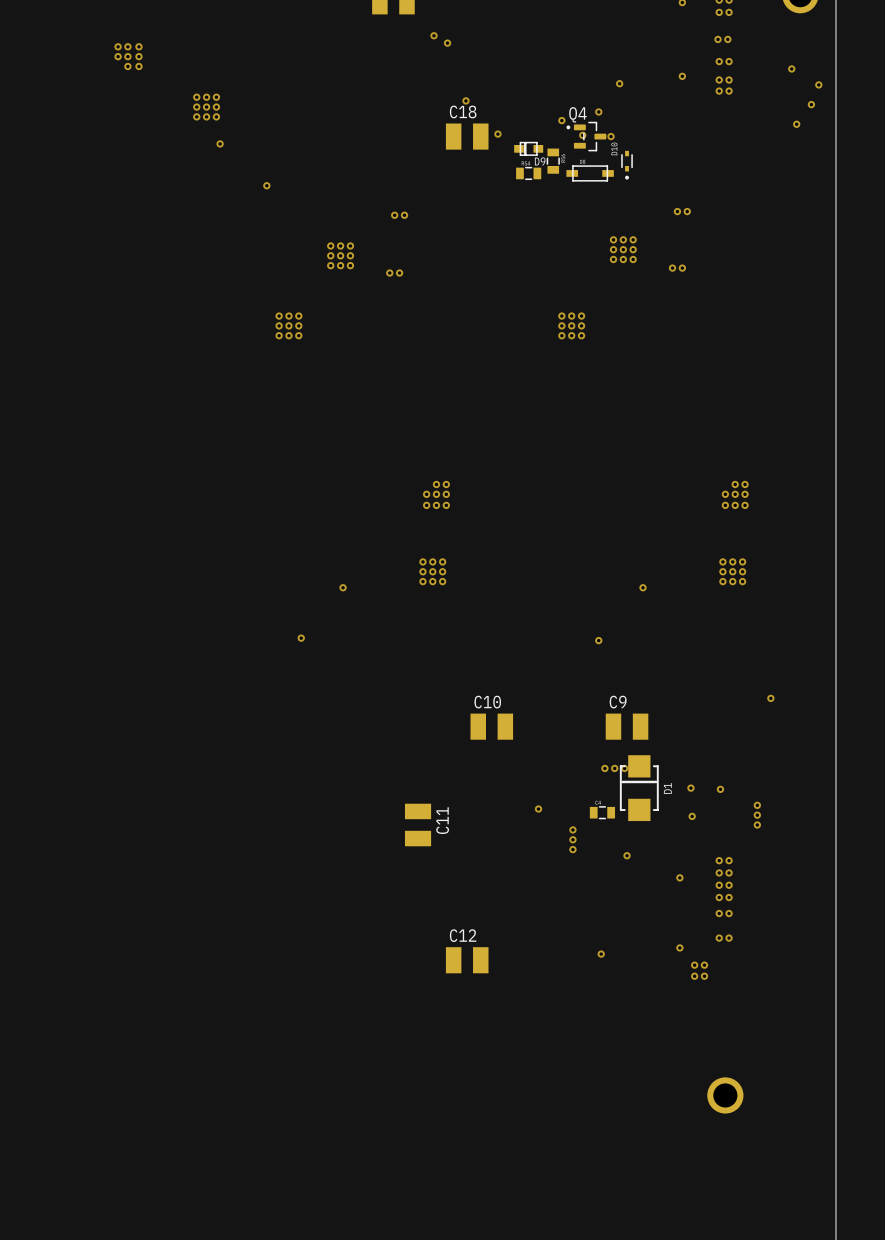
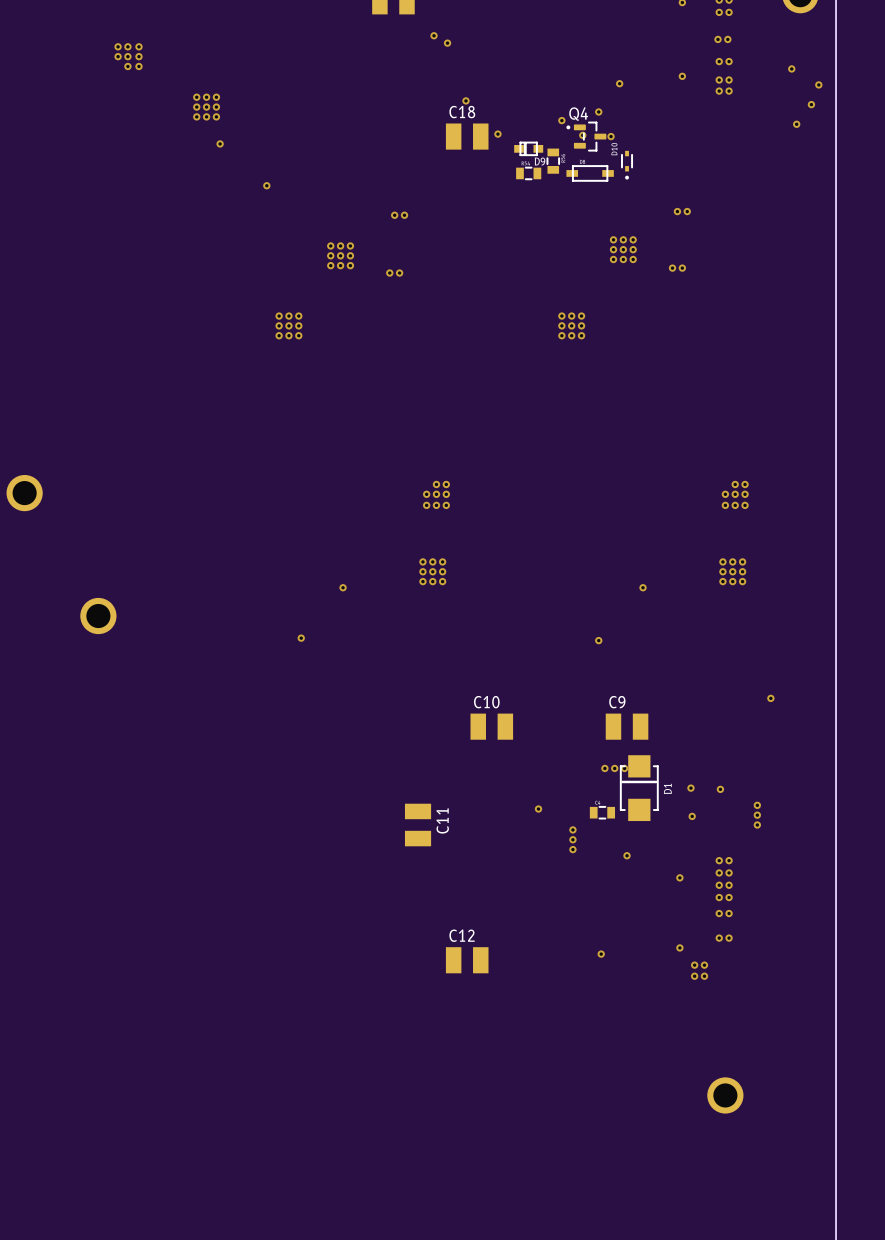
part: none -> (24, 493)
part: none -> (98, 616)

